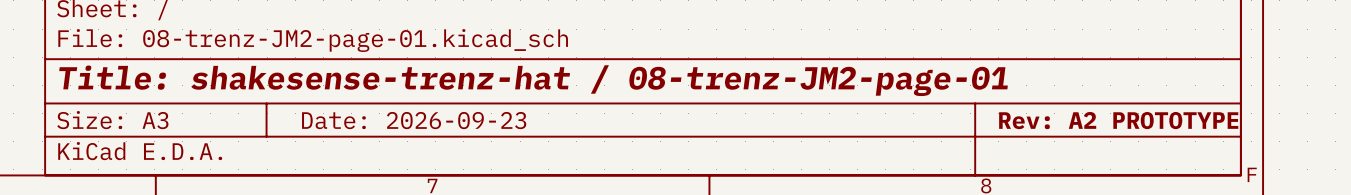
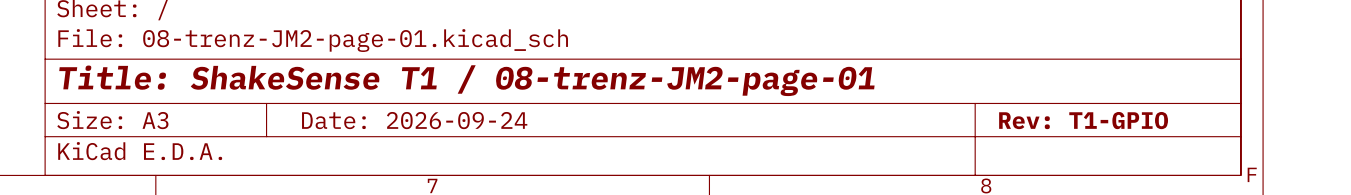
title block: Title: shakesense-trenz-hat / 08-trenz-JM2-page-01 (533, 80) -> Title: ShakeSense T1 / 08-trenz-JM2-page-01 (466, 80)
title block: Date: 2026-09-23 (414, 120) -> Date: 2026-09-24 (414, 120)
title block: Rev: A2 PROTOTYPE (1118, 120) -> Rev: T1-GPIO (1083, 120)

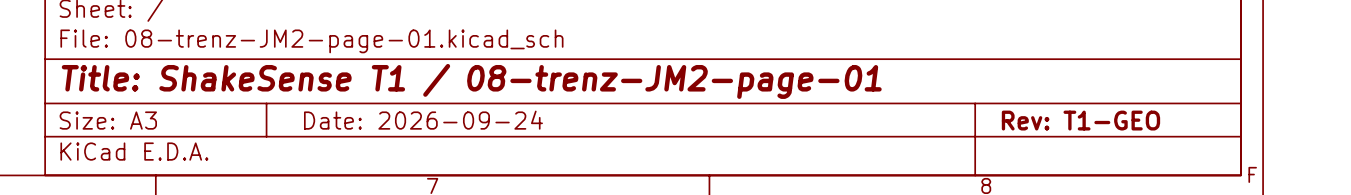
title block: Rev: T1-GPIO (1083, 120) -> Rev: T1-GEO (1080, 120)

